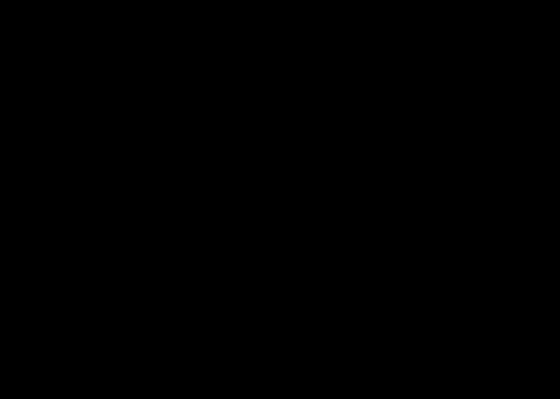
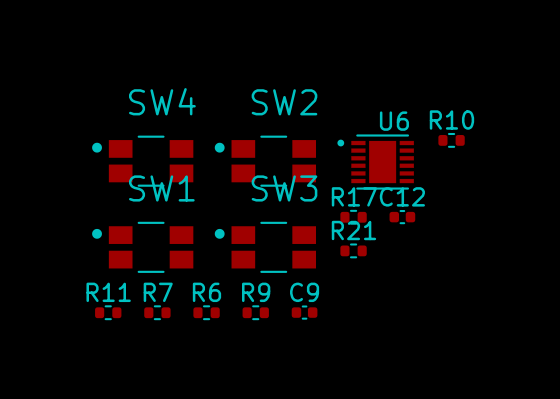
R10: none -> (451, 140)
SW4: none -> (142, 161)
SW2: none -> (265, 161)
U6: none -> (375, 162)
R17: none -> (353, 217)
C12: none -> (402, 217)
SW1: none -> (142, 247)
SW3: none -> (265, 247)
R21: none -> (353, 250)
R11: none -> (108, 312)
R7: none -> (157, 312)
R6: none -> (206, 312)
R9: none -> (255, 312)
C9: none -> (304, 312)

